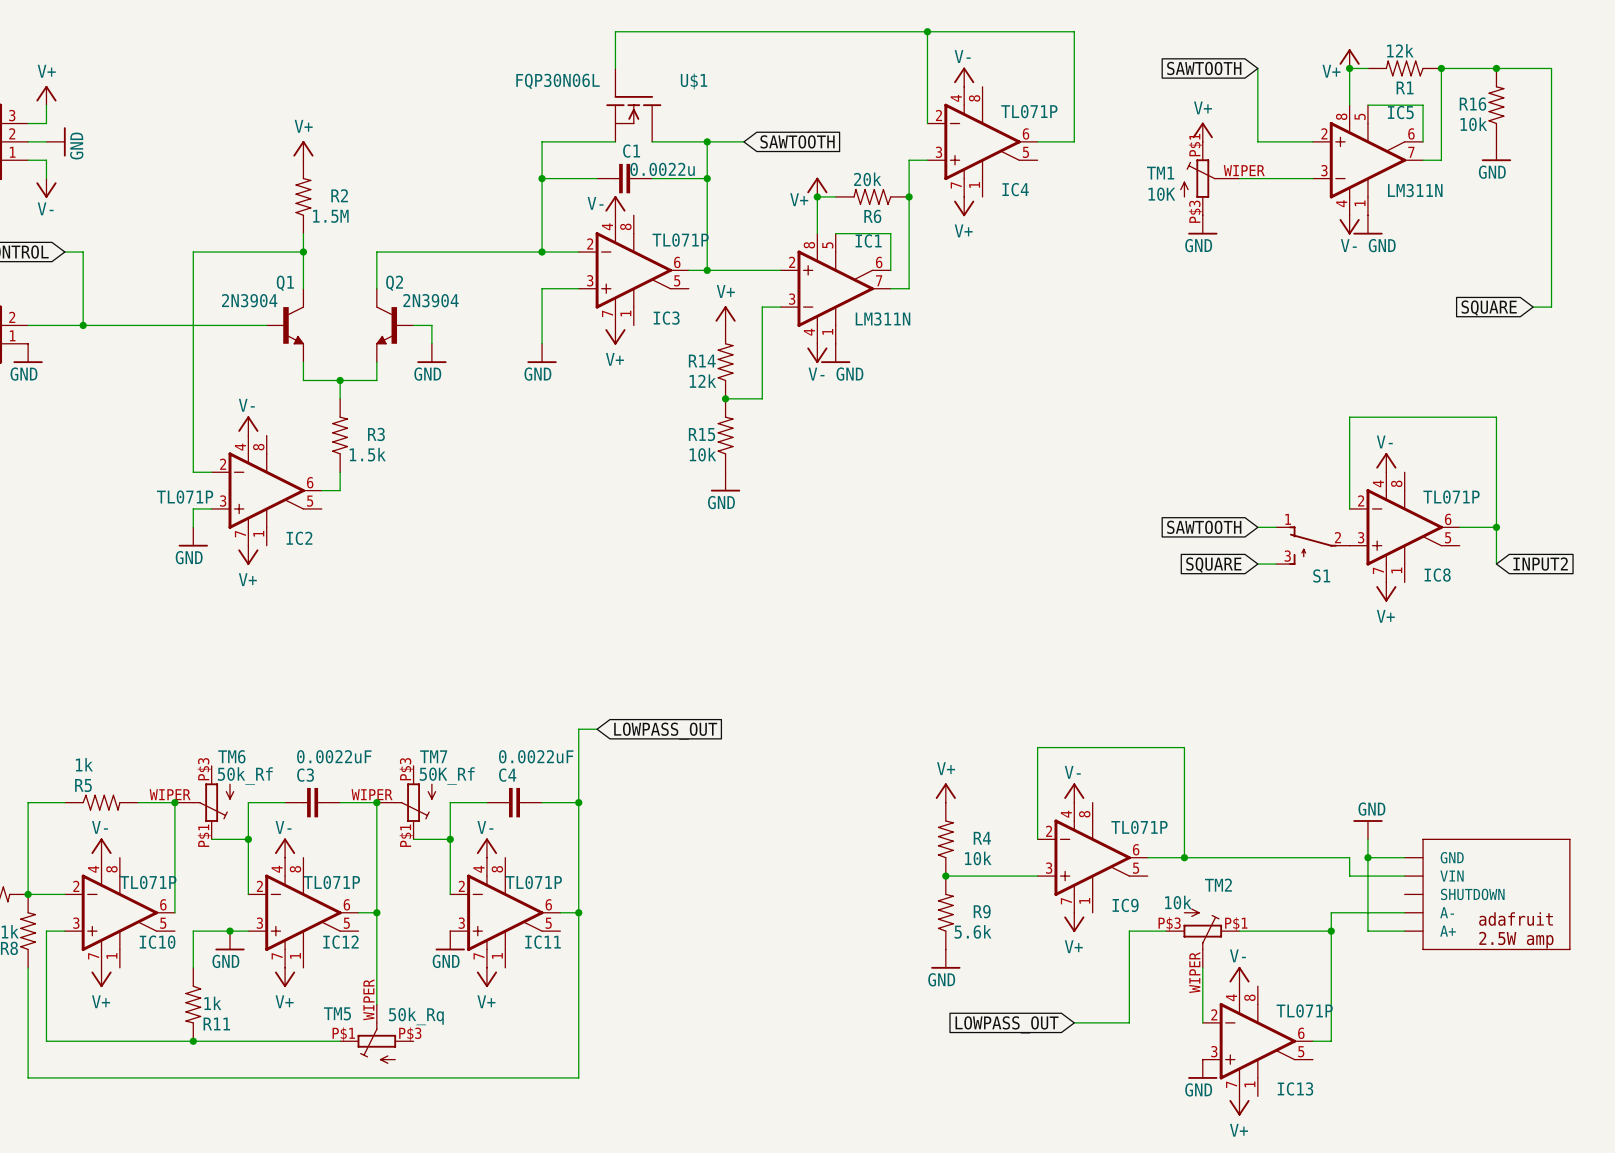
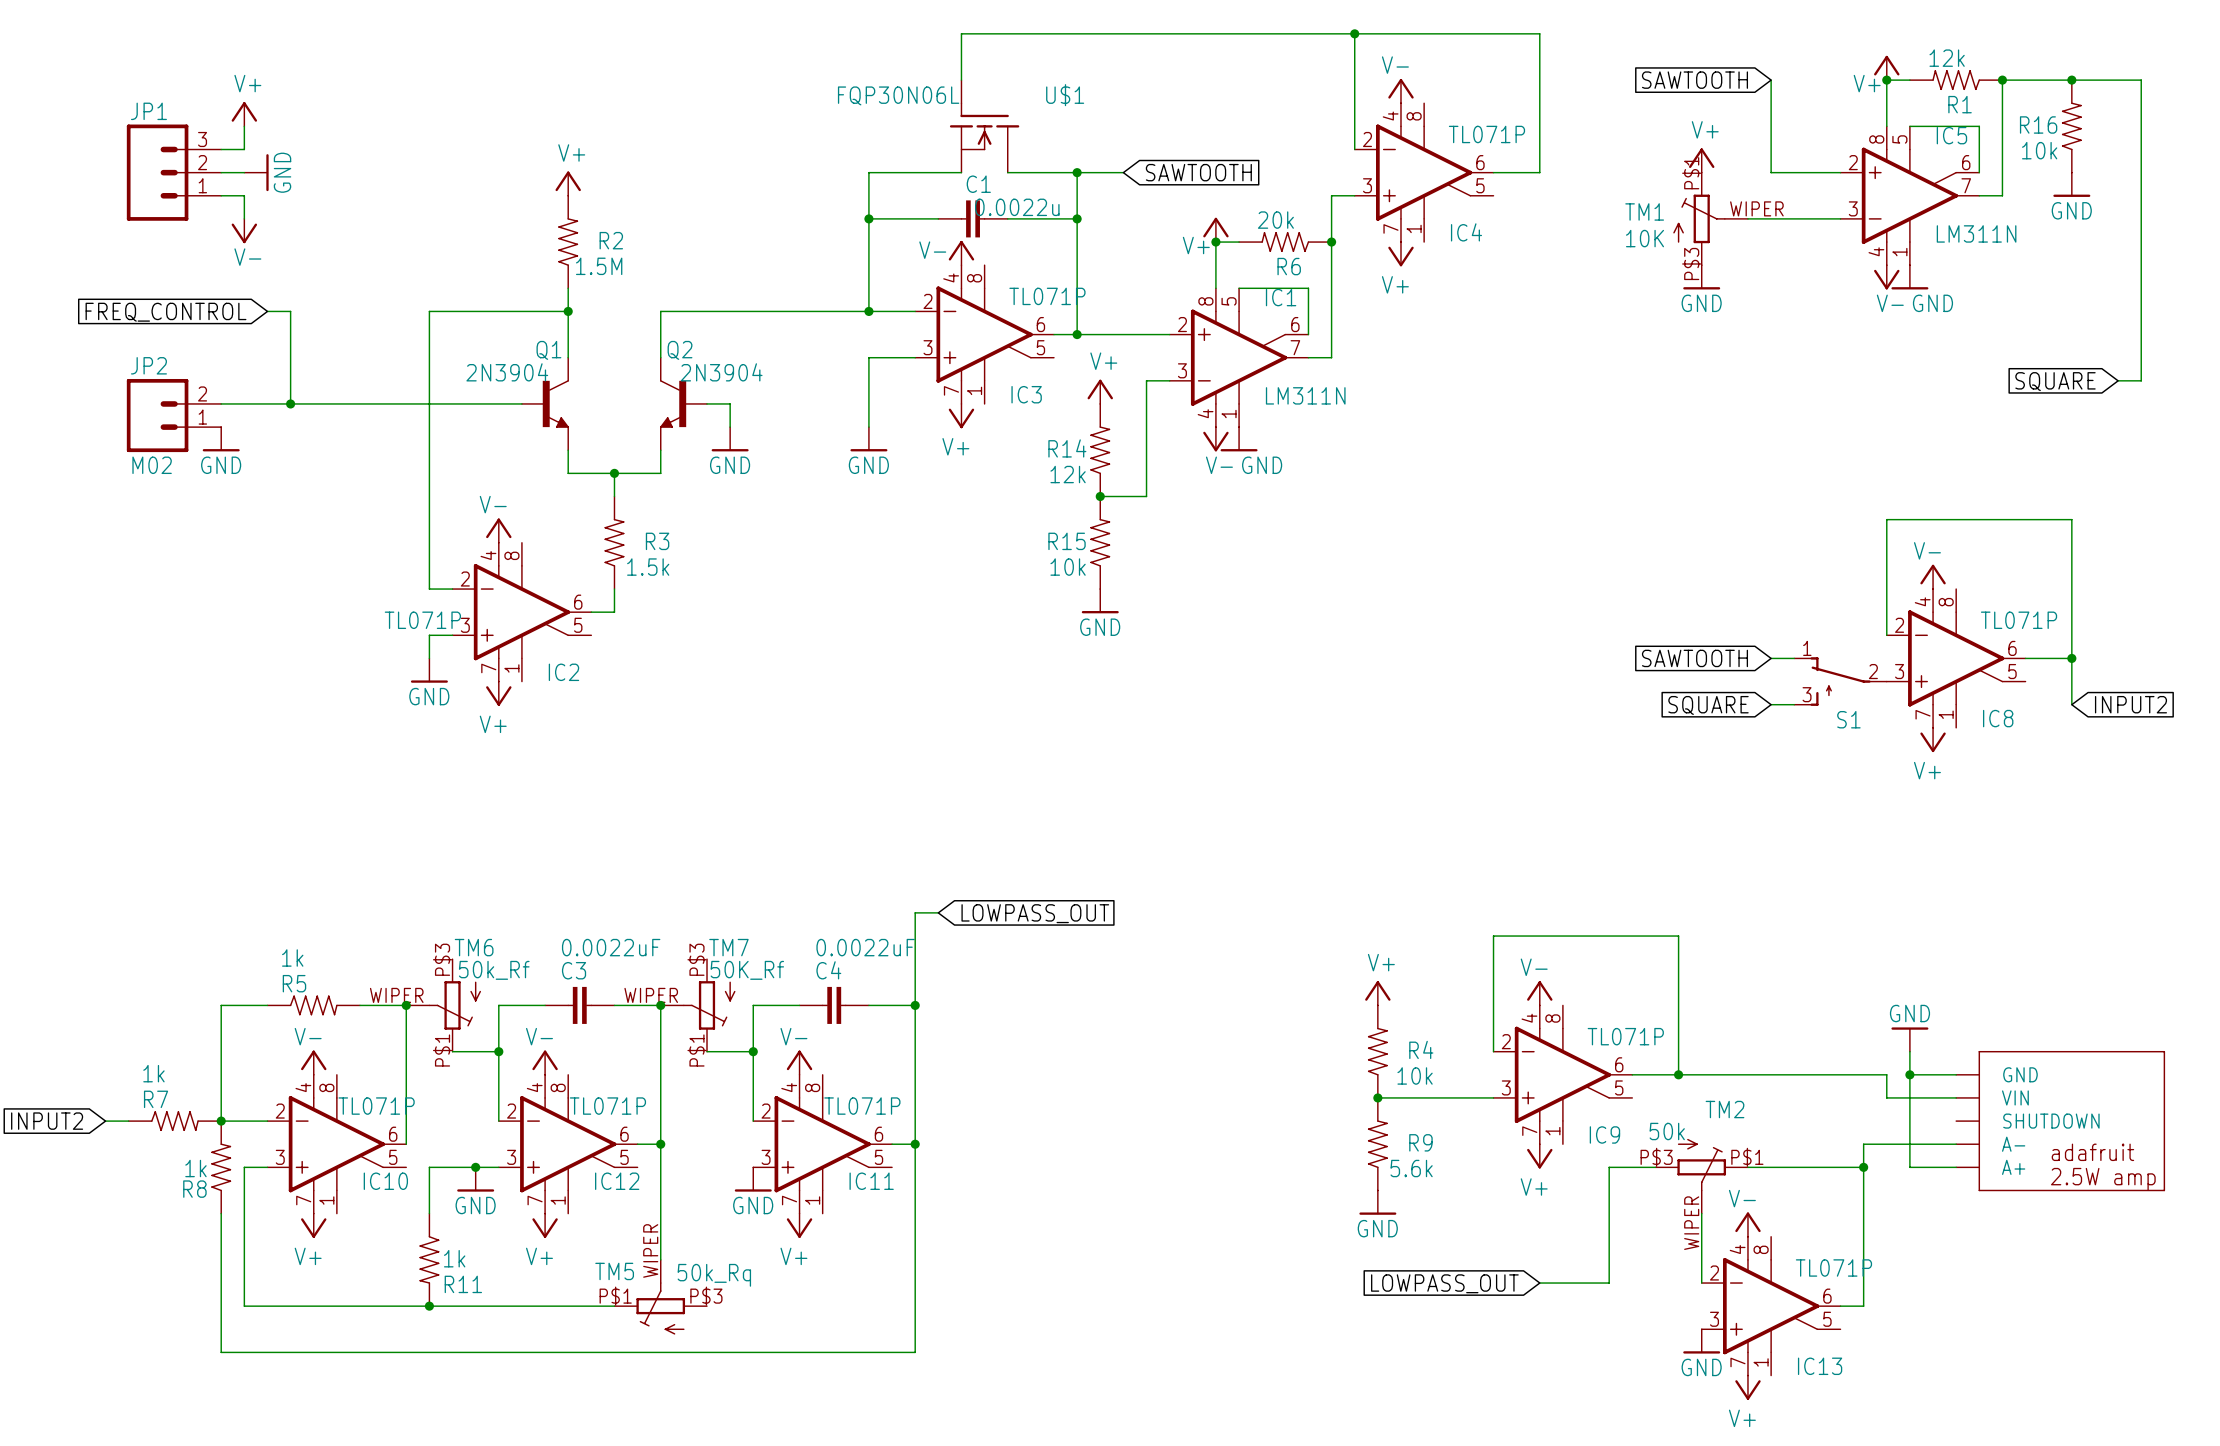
TM2 value: 10k (1178, 902) -> 50k (1667, 1131)

